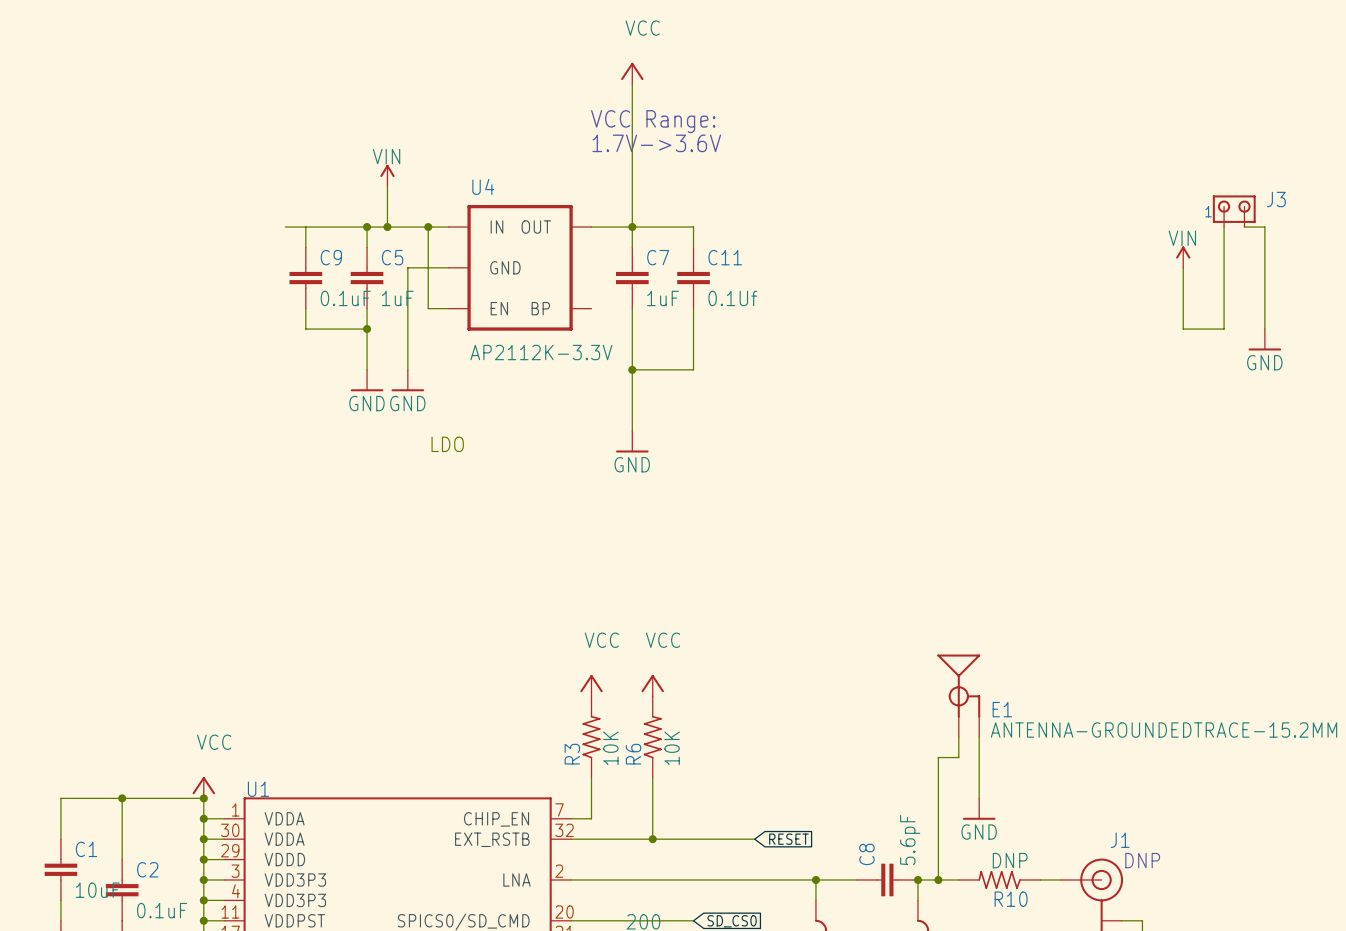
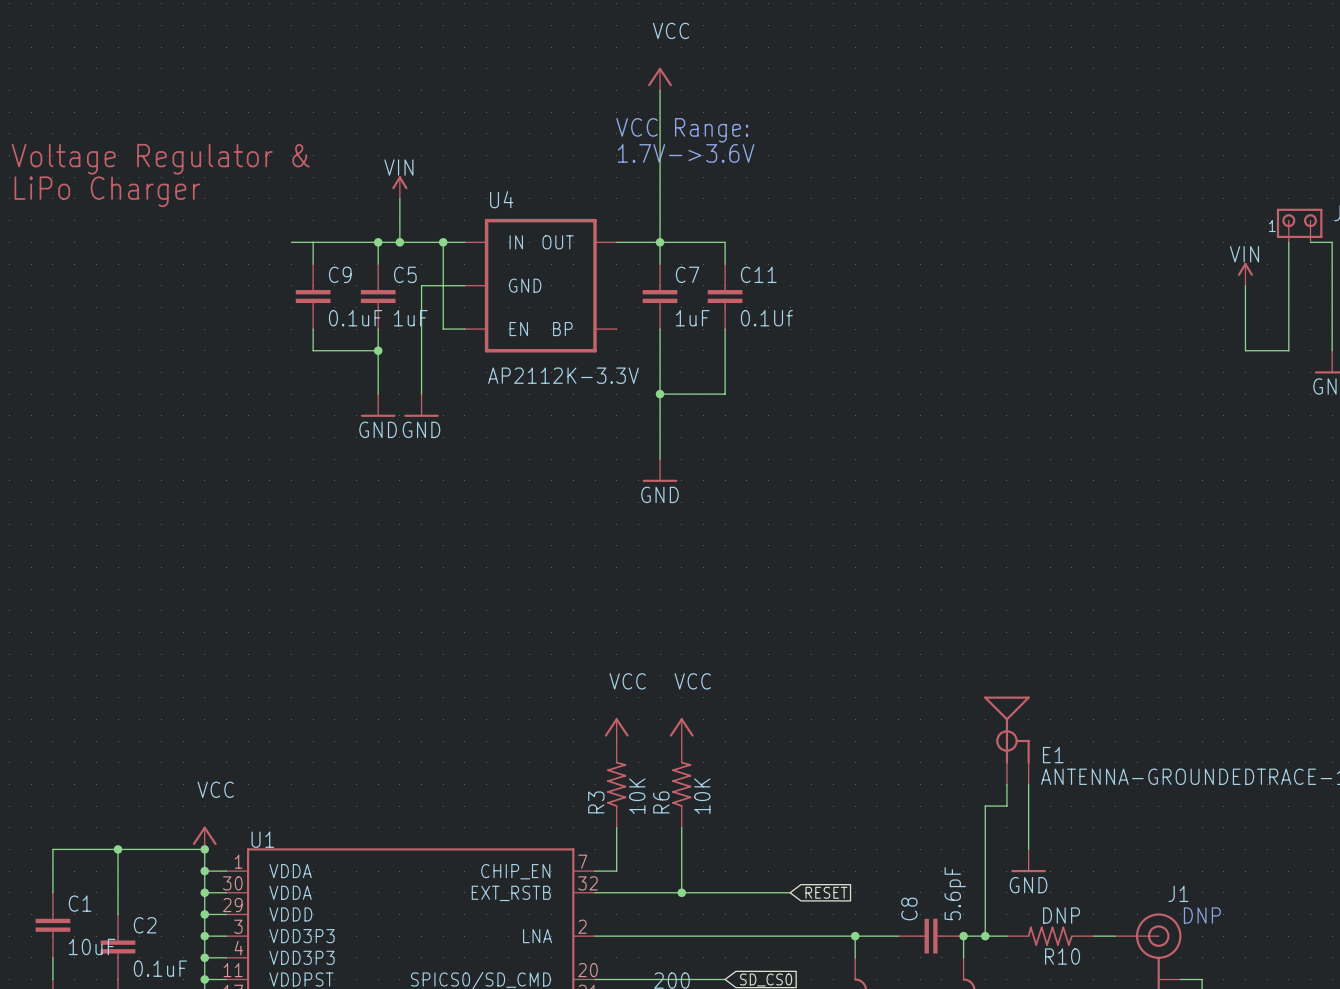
text: none -> Voltage Regulator & (160, 159)
text: none -> LiPo Charger (107, 191)
text: LDO (447, 444) -> none

